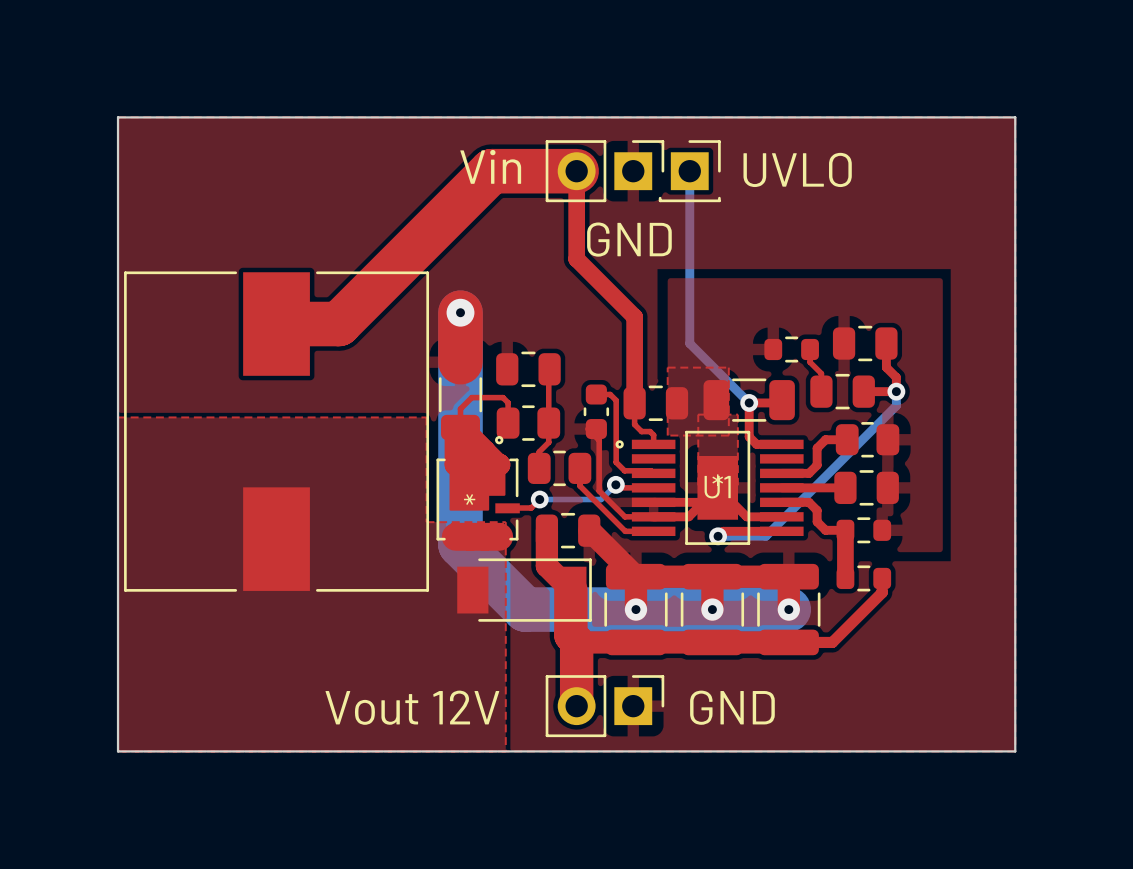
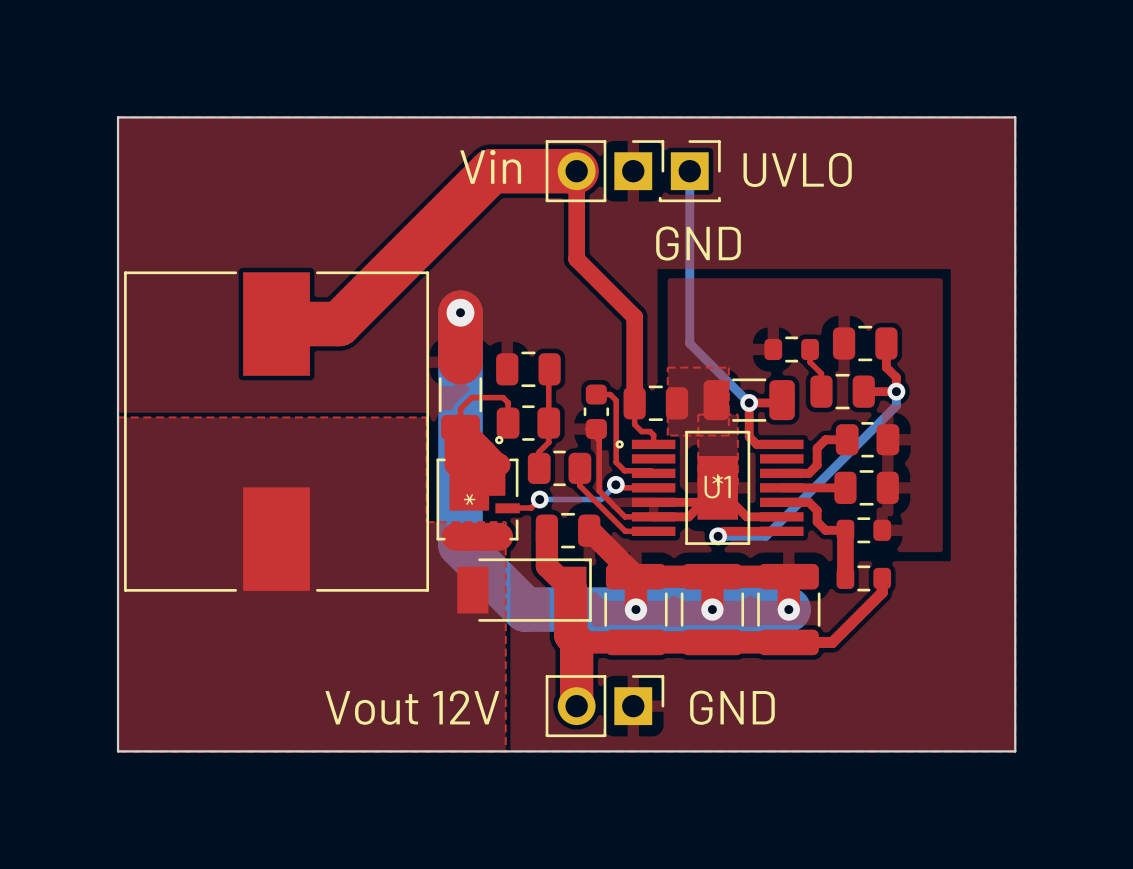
text position: GND (629, 239) -> GND (698, 243)

